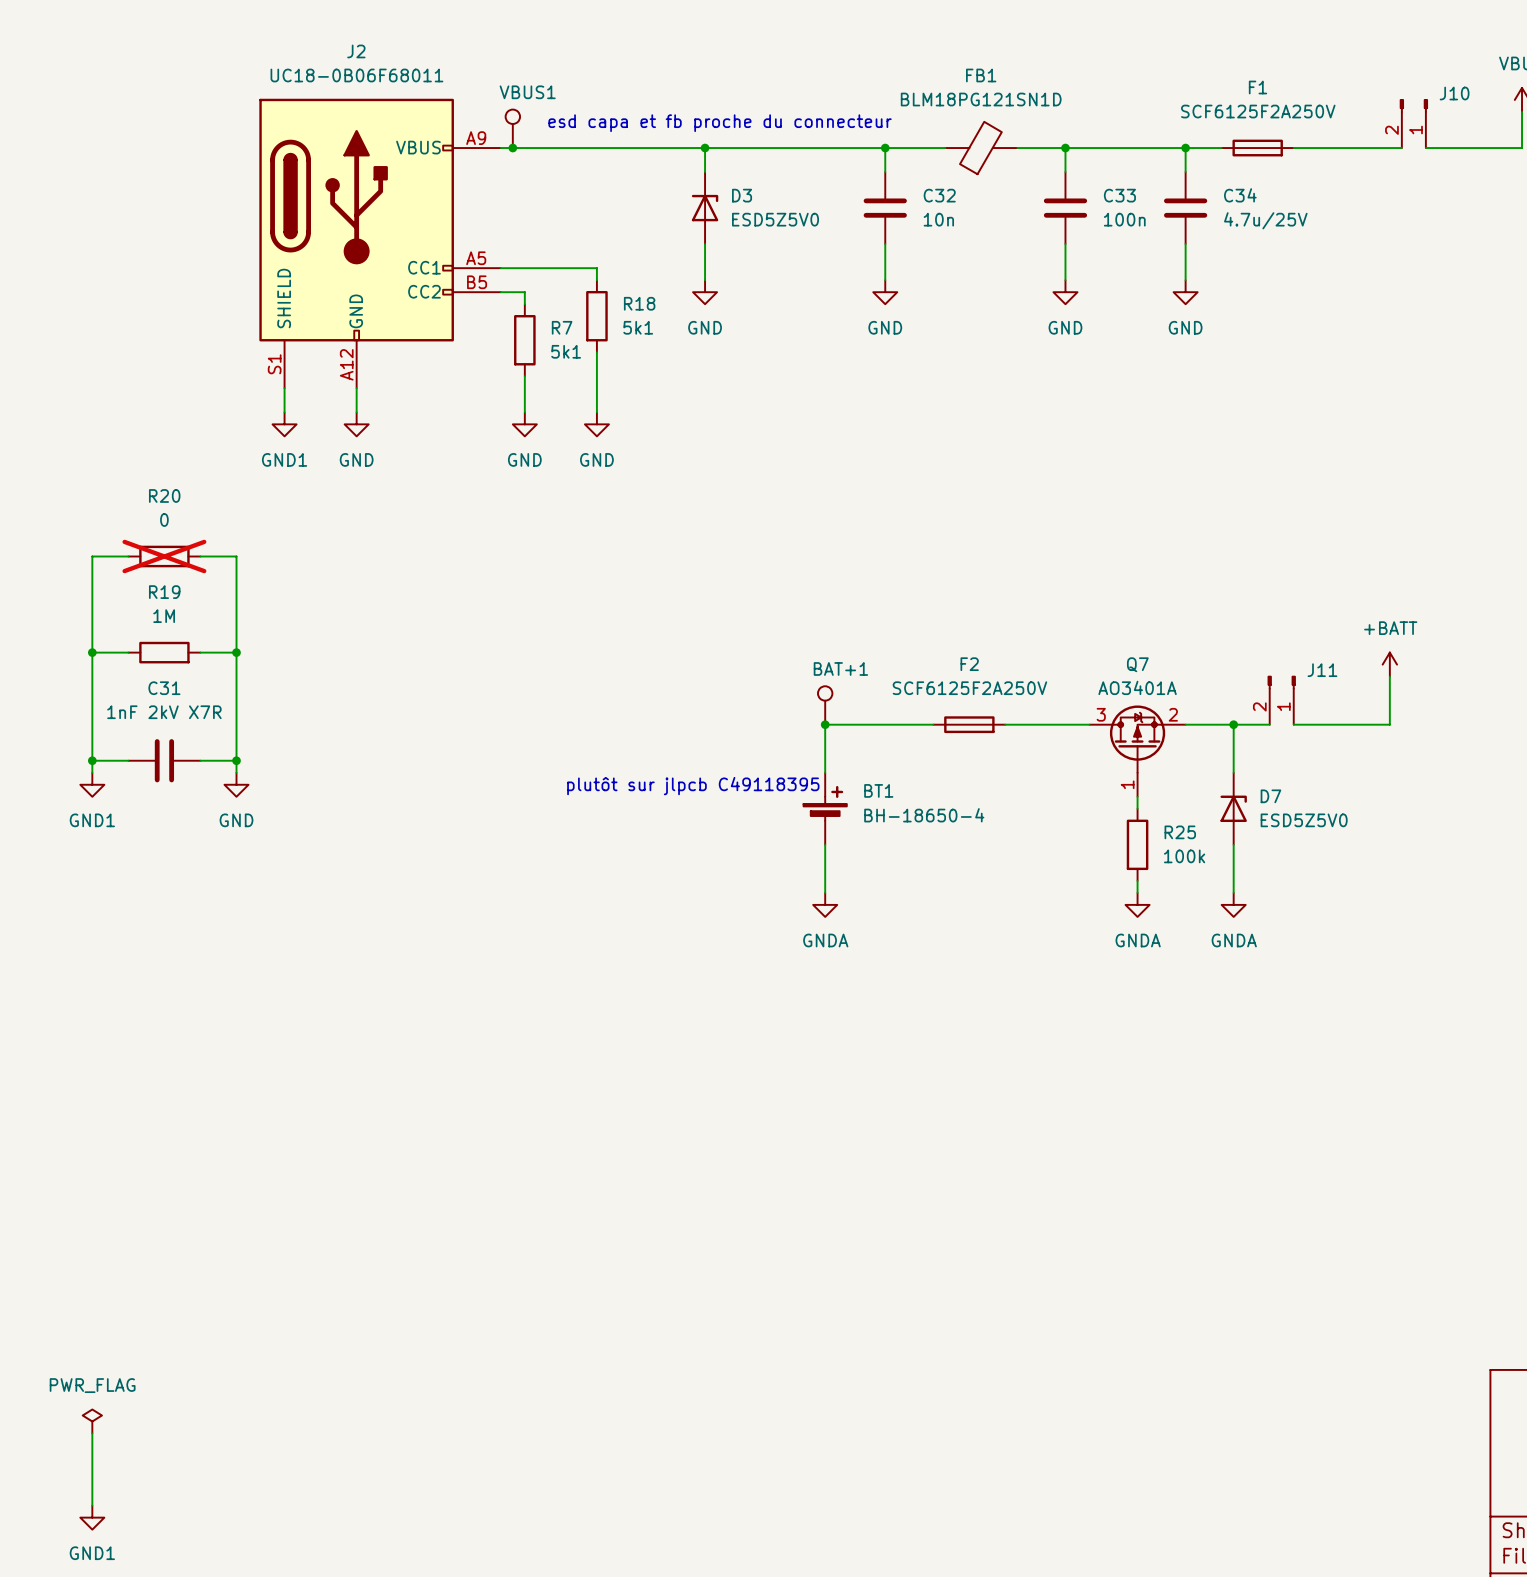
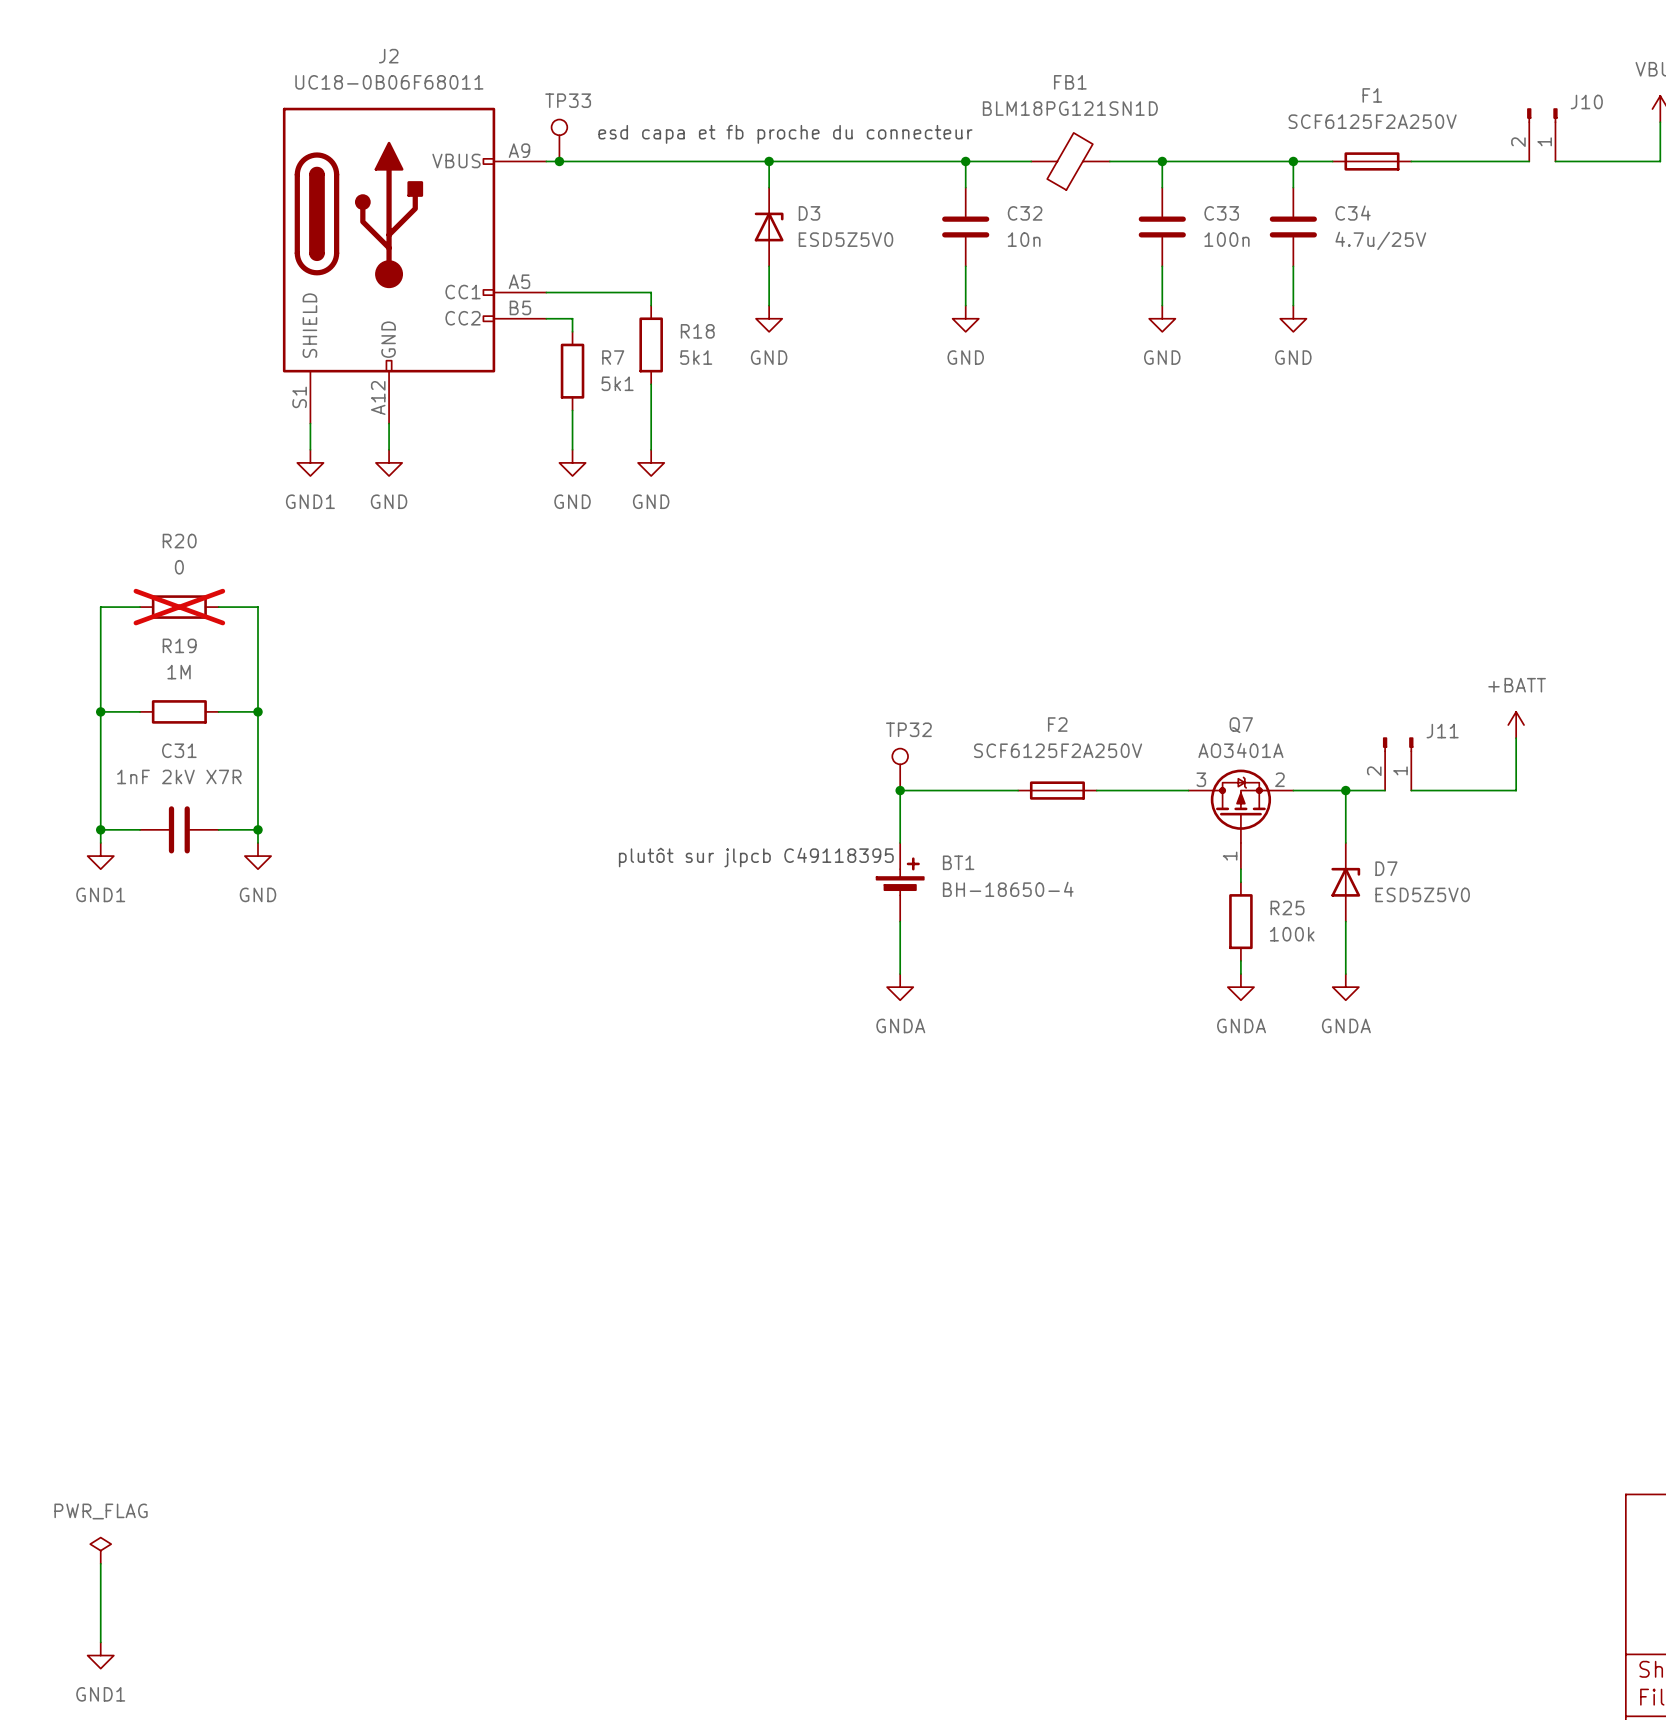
VBUS1 name: VBUS1 (527, 92) -> TP33 (568, 100)
BAT+1 name: BAT+1 (840, 668) -> TP32 (908, 729)

